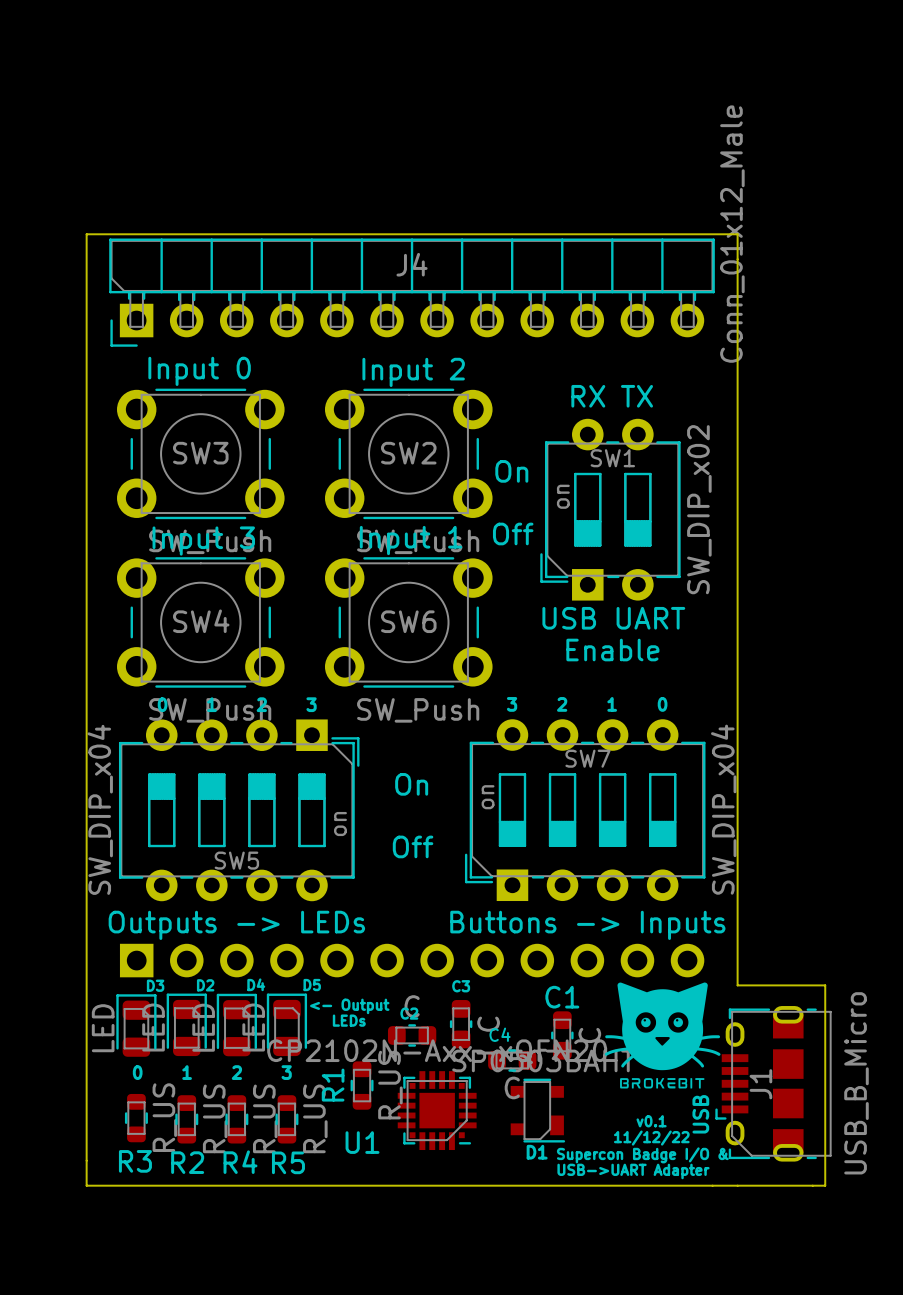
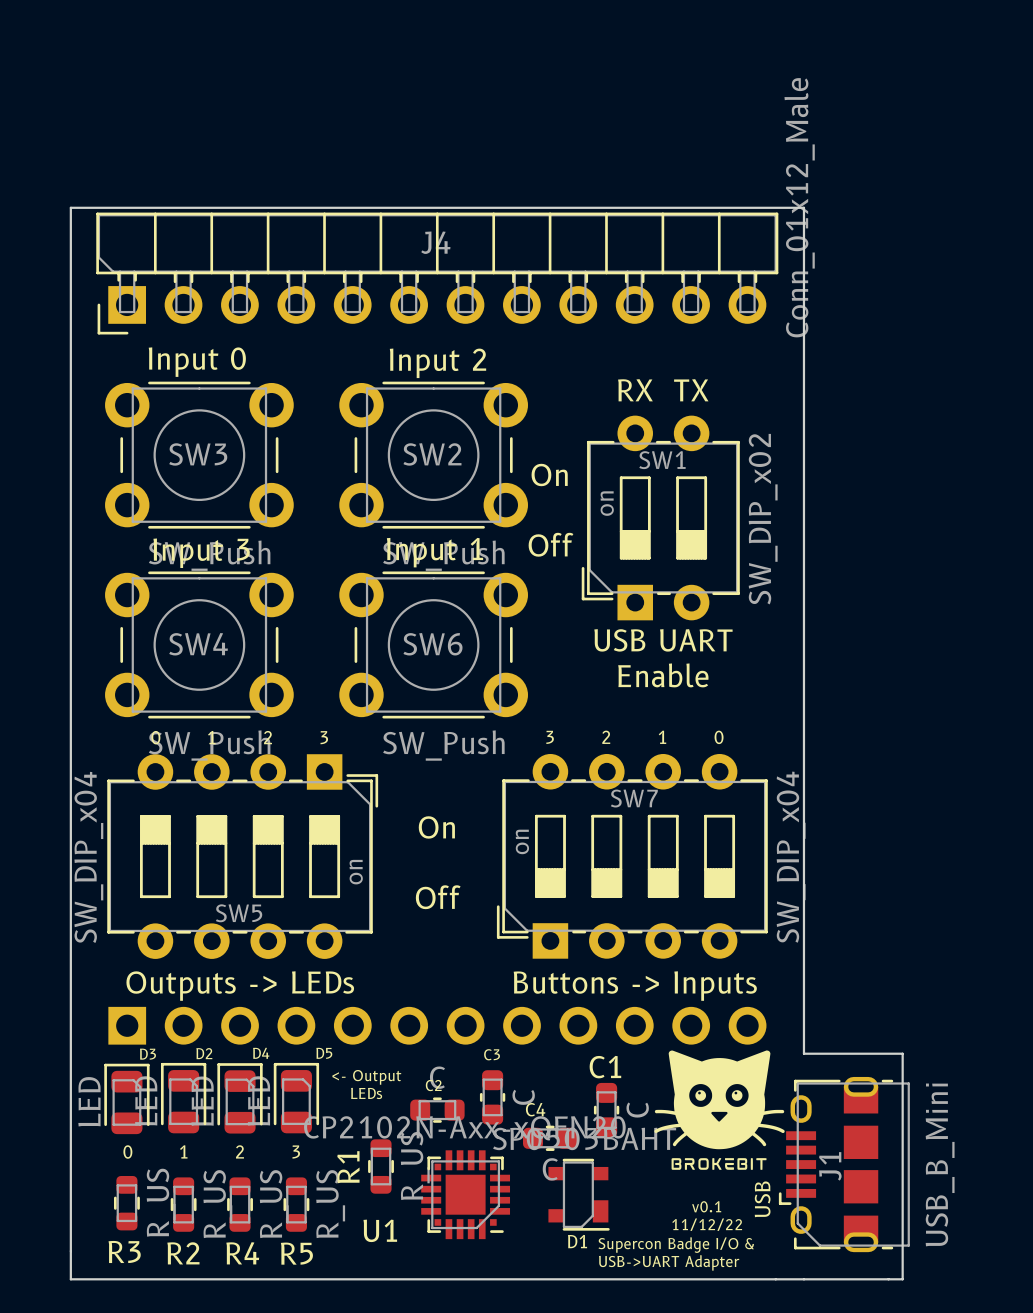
J1 value: USB_B_Micro (856, 1083) -> USB_B_Mini (940, 1164)

